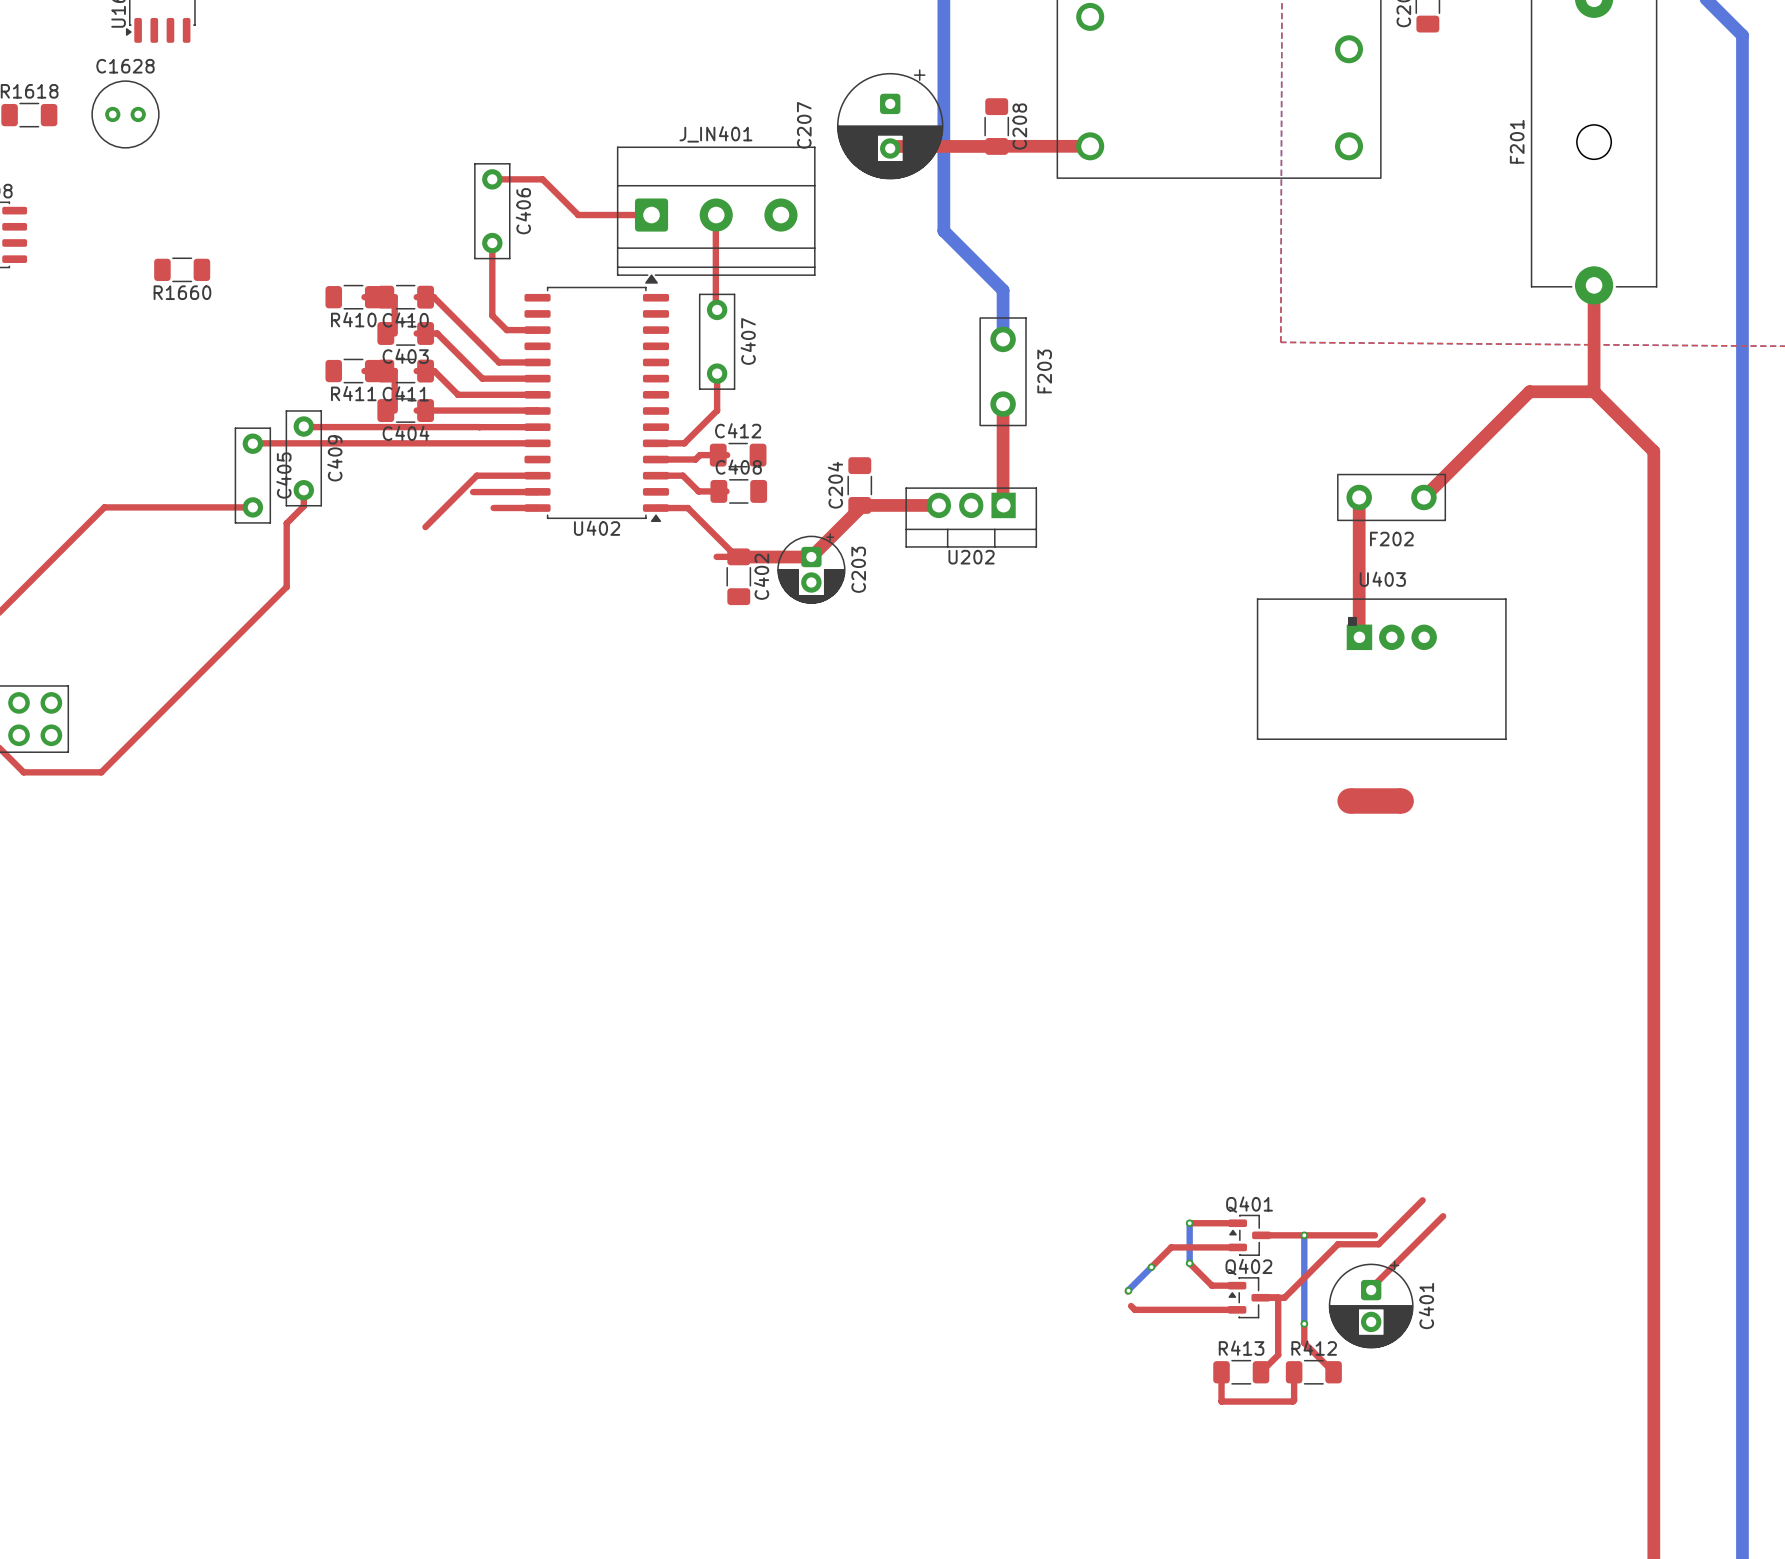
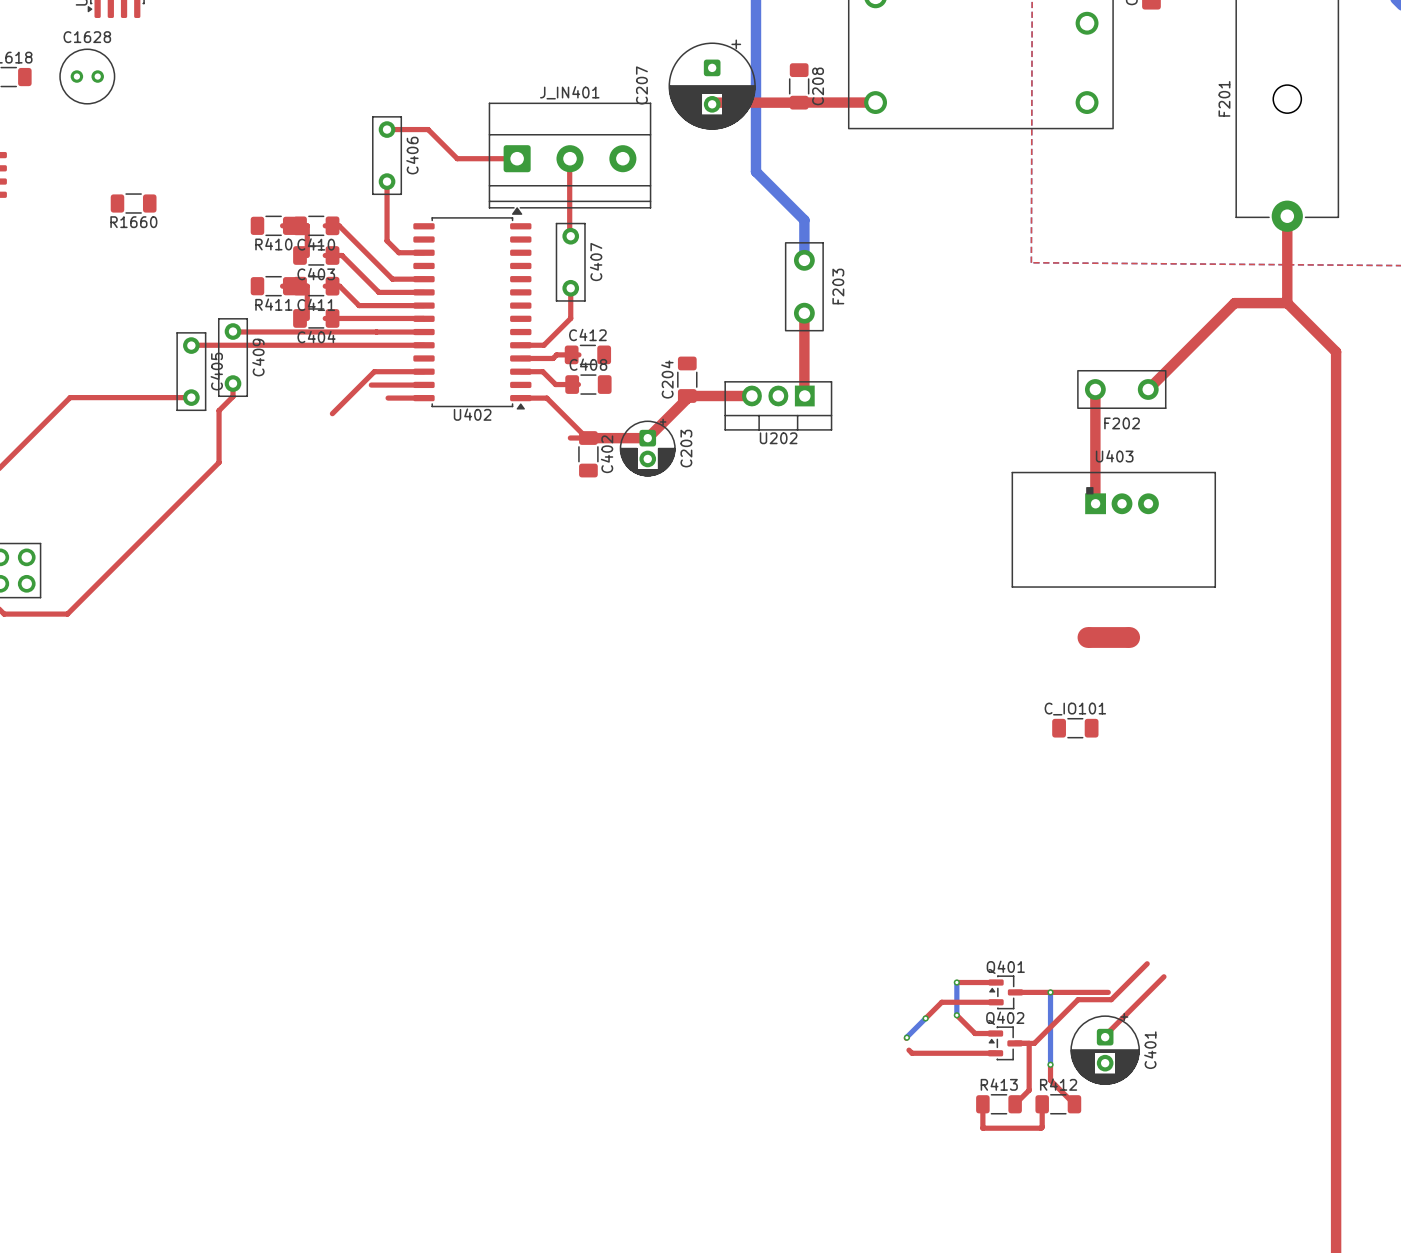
C_IO101: none -> (1075, 728)

